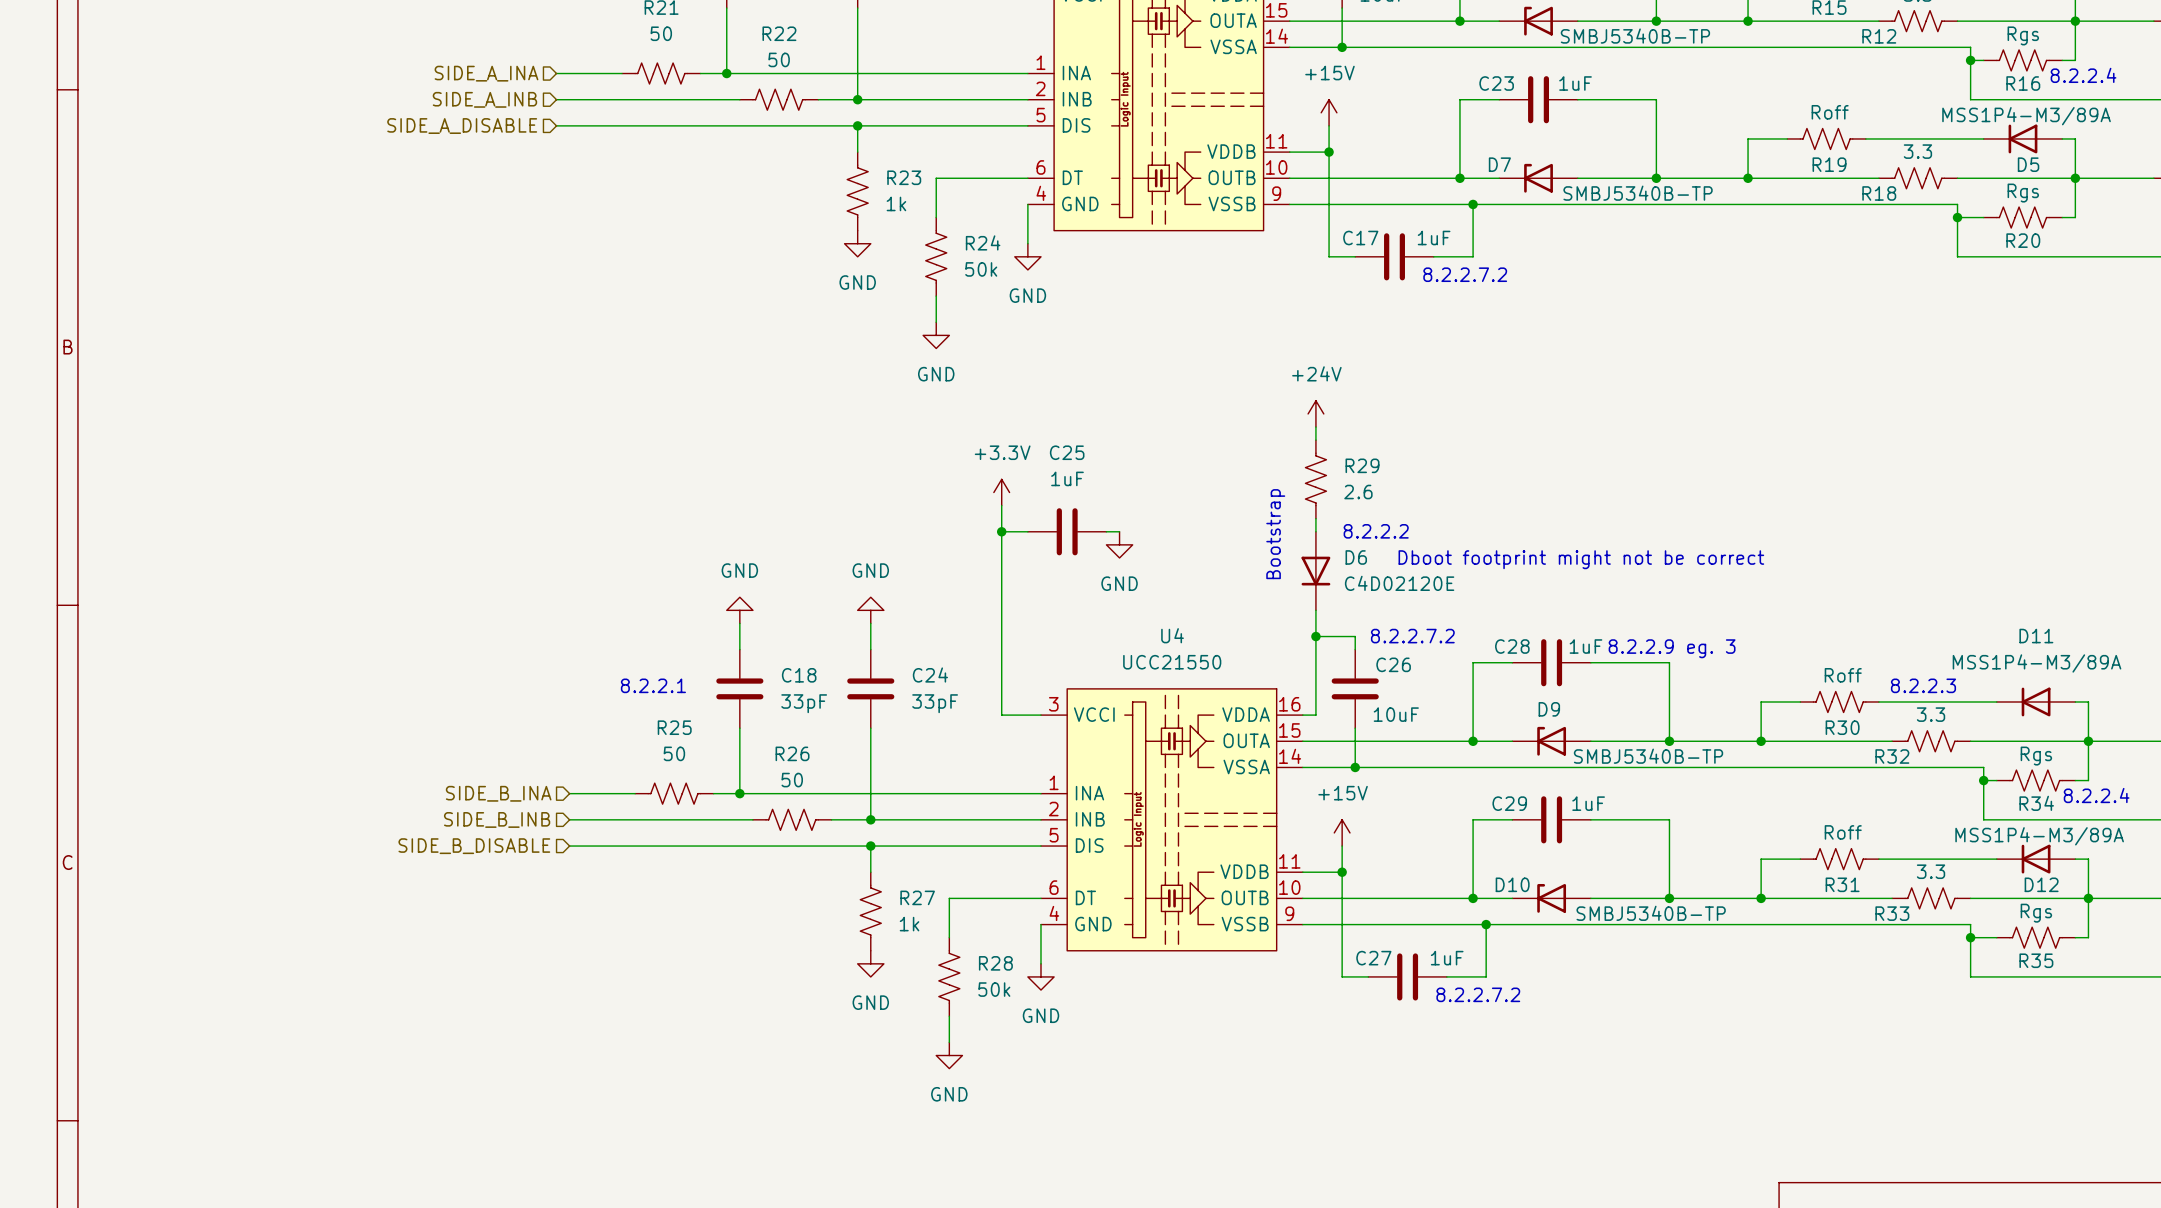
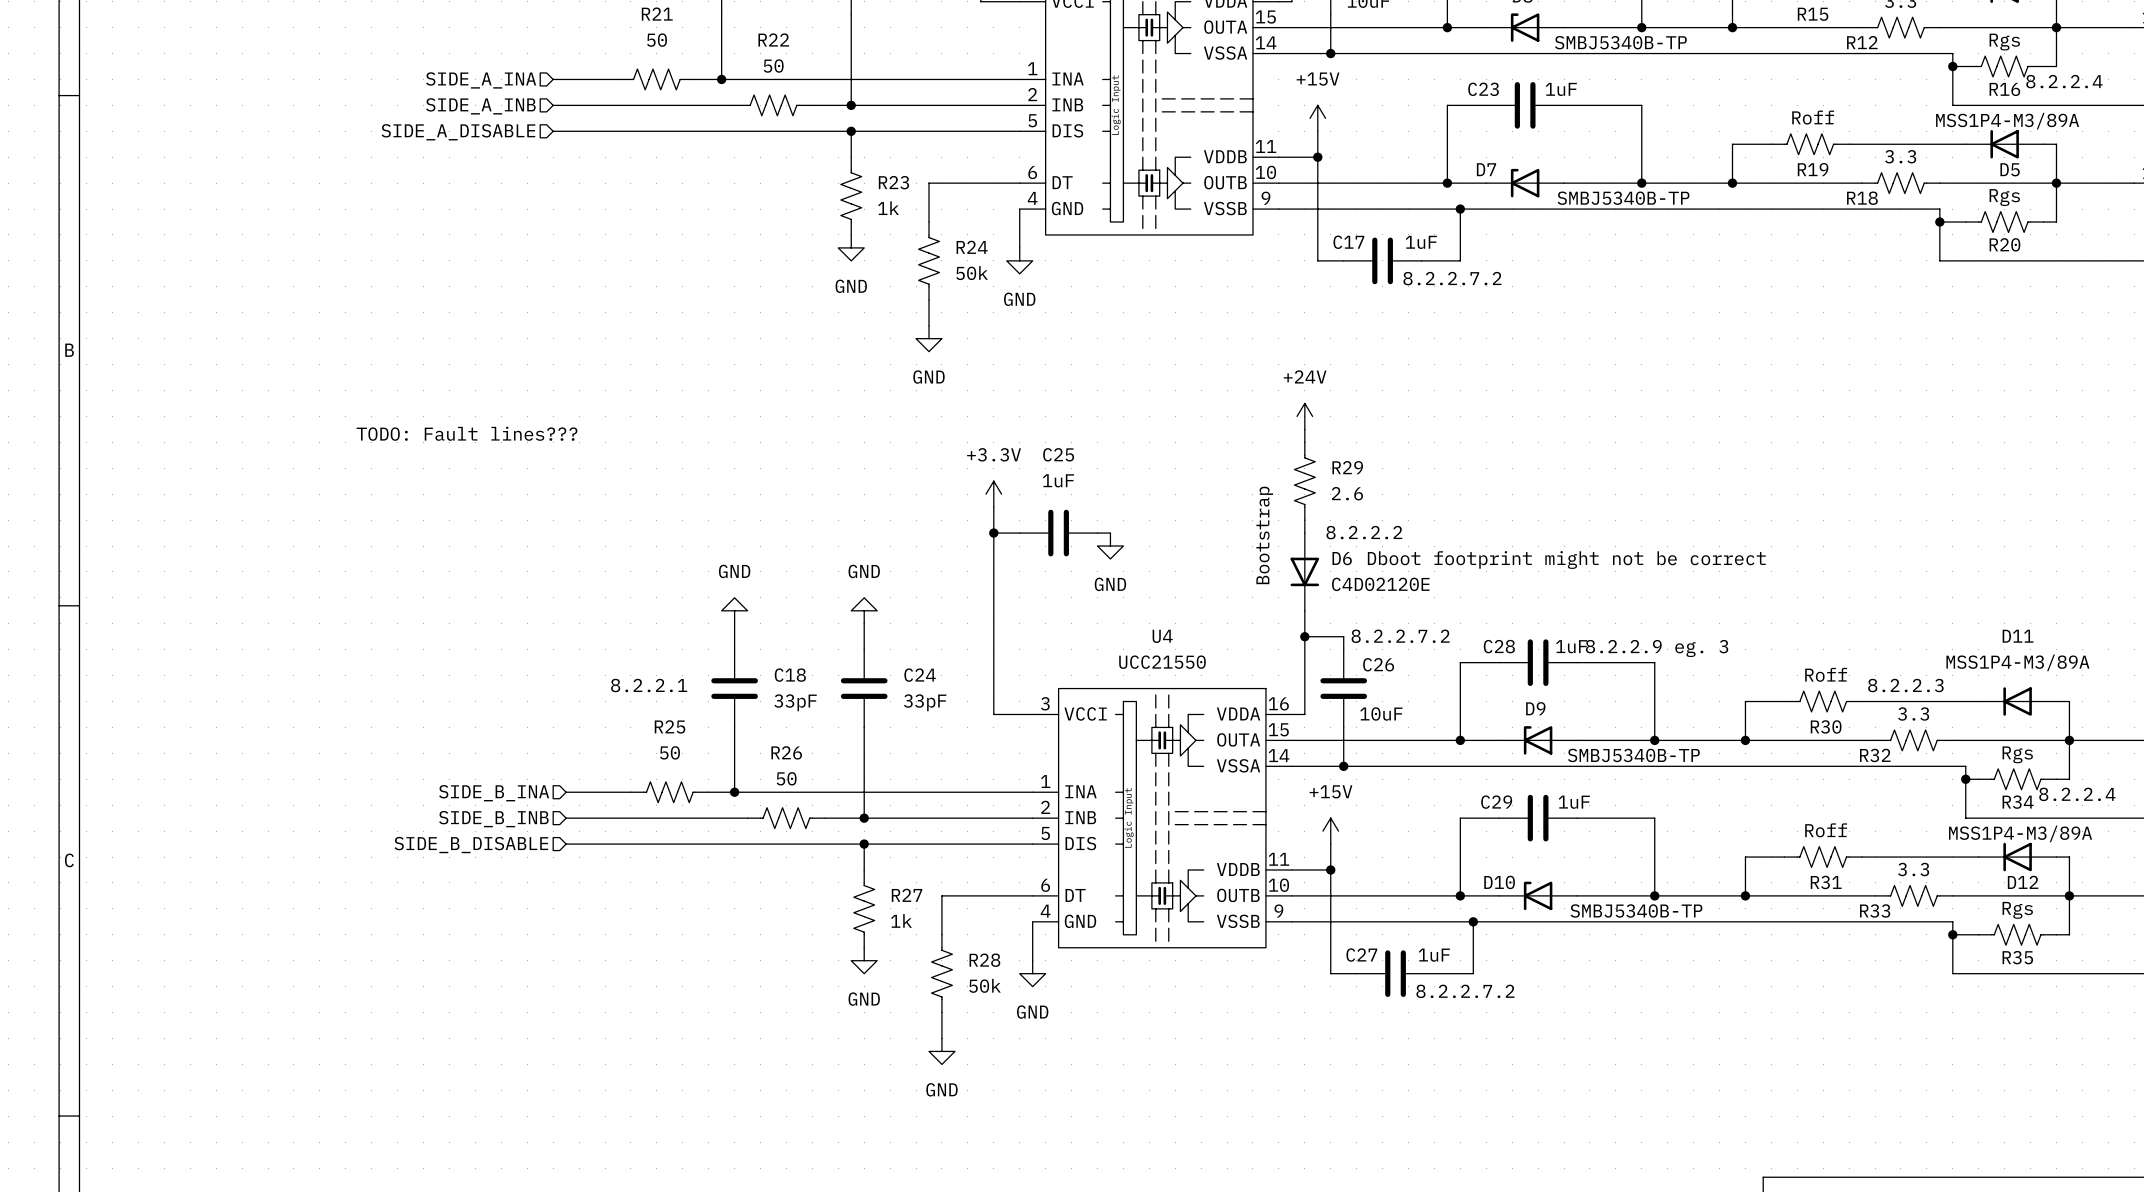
text: none -> TODO: Fault lines??? (467, 433)

